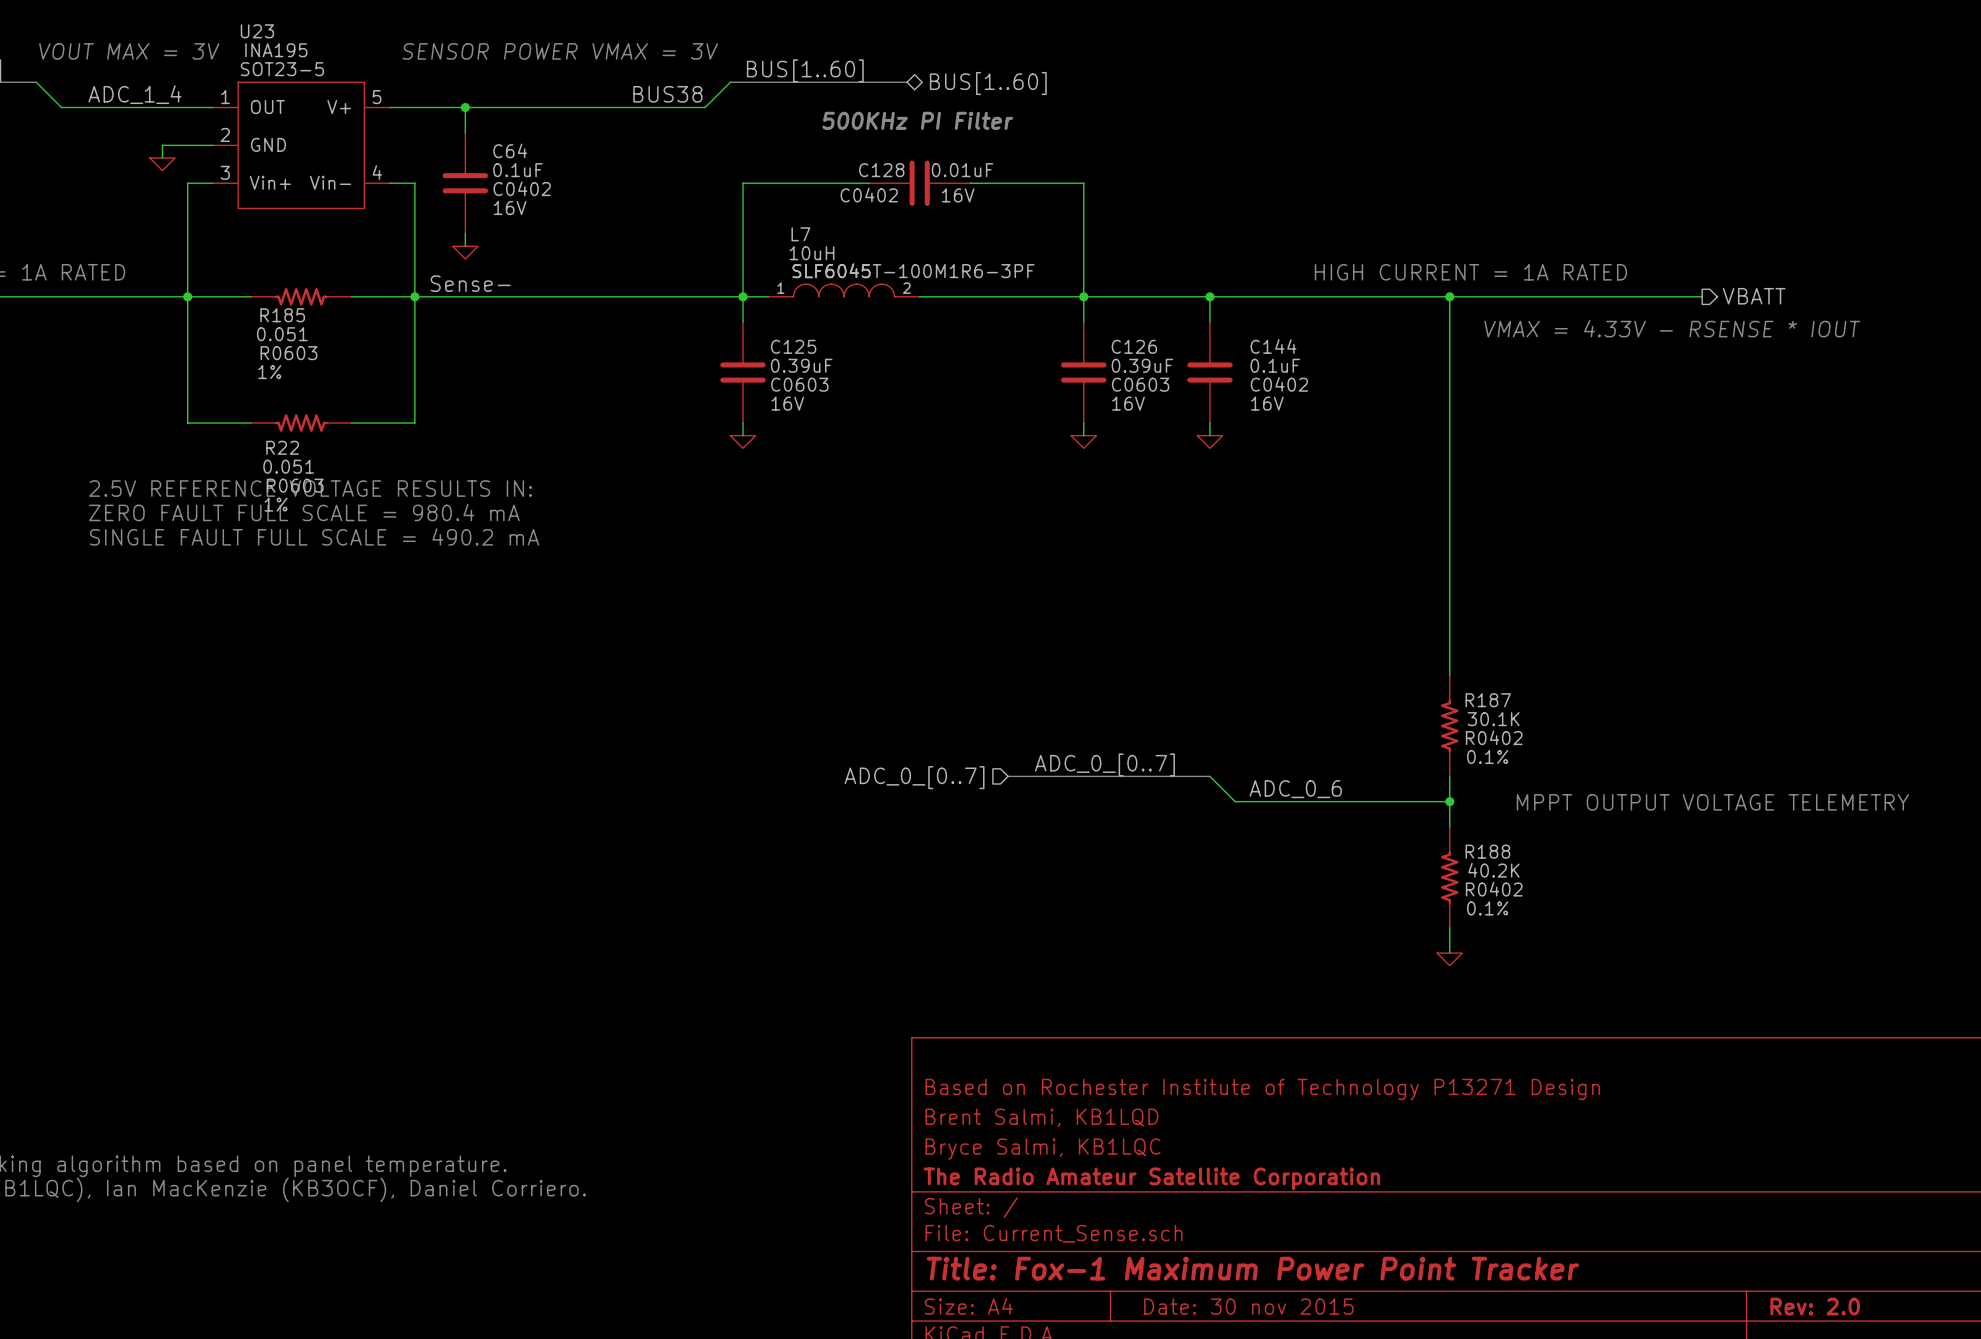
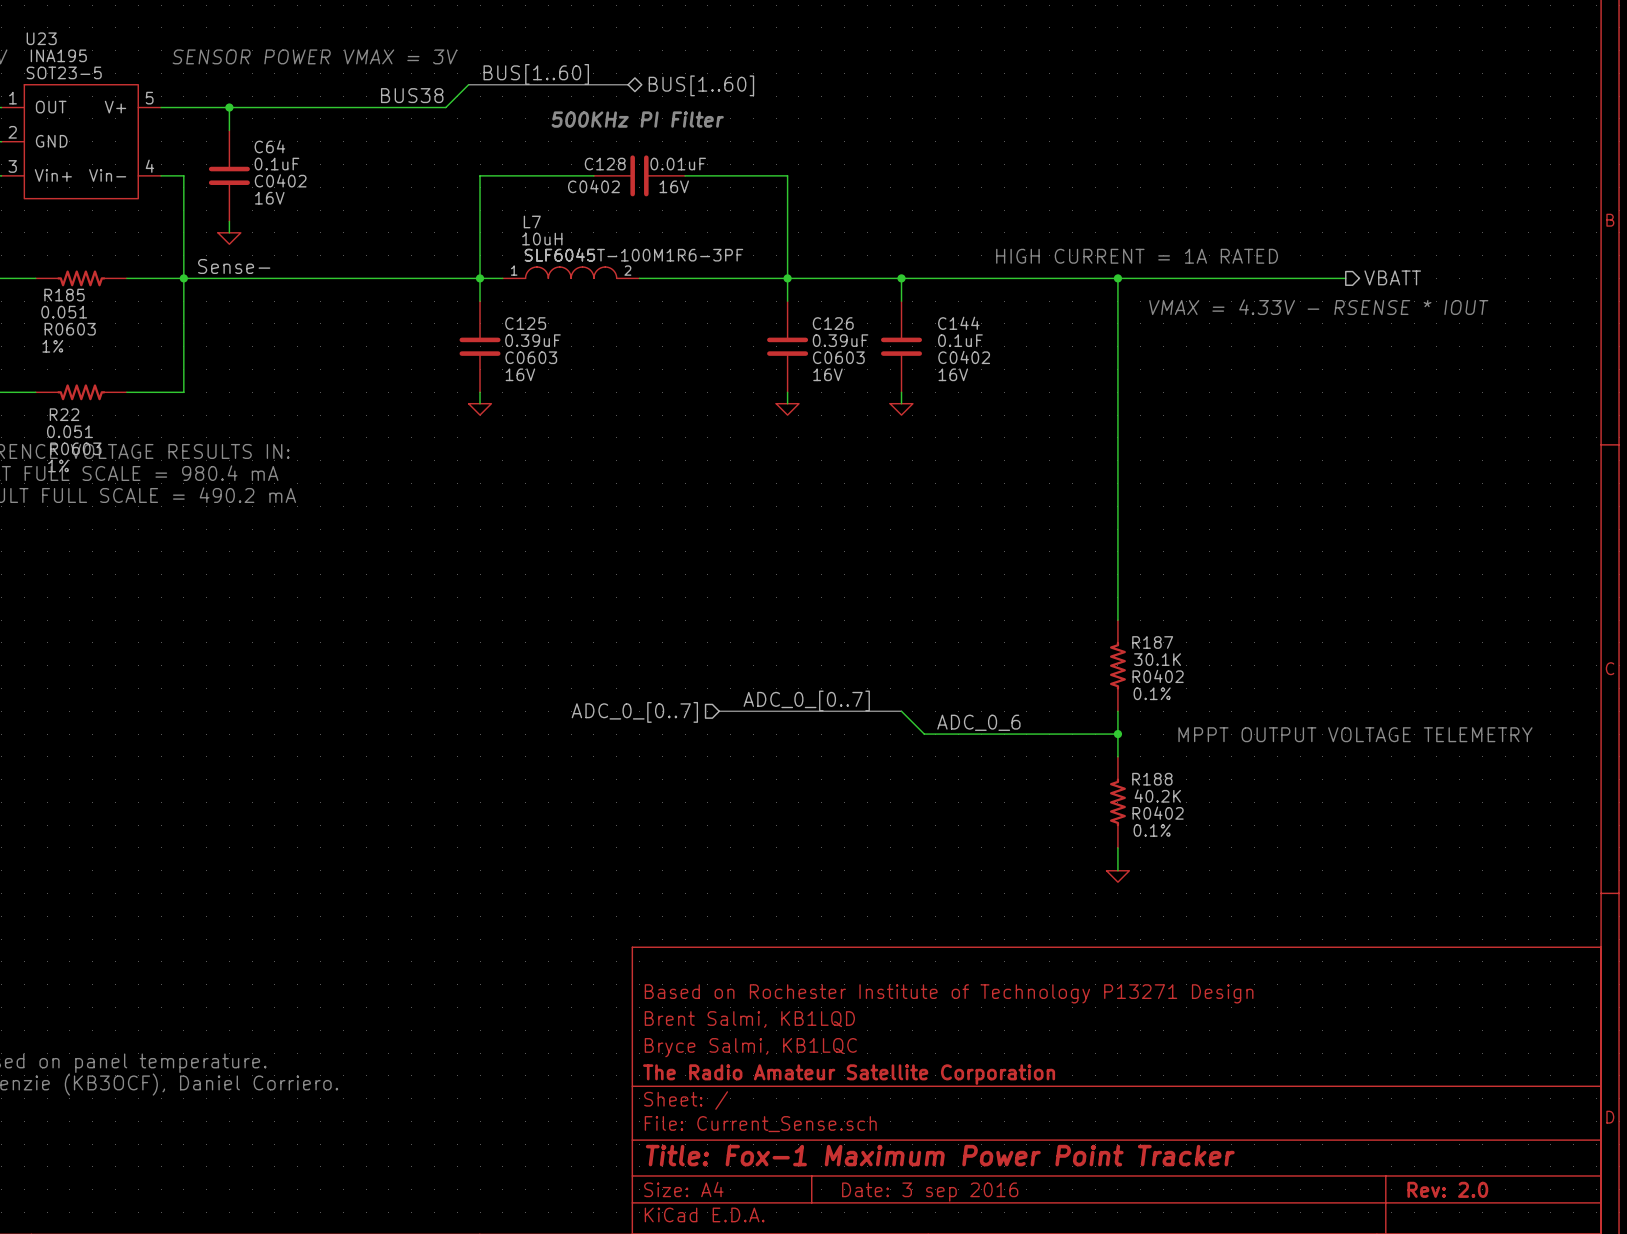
title block: Date: 30 nov 2015 (1248, 1306) -> Date: 3 sep 2016 (930, 1192)

